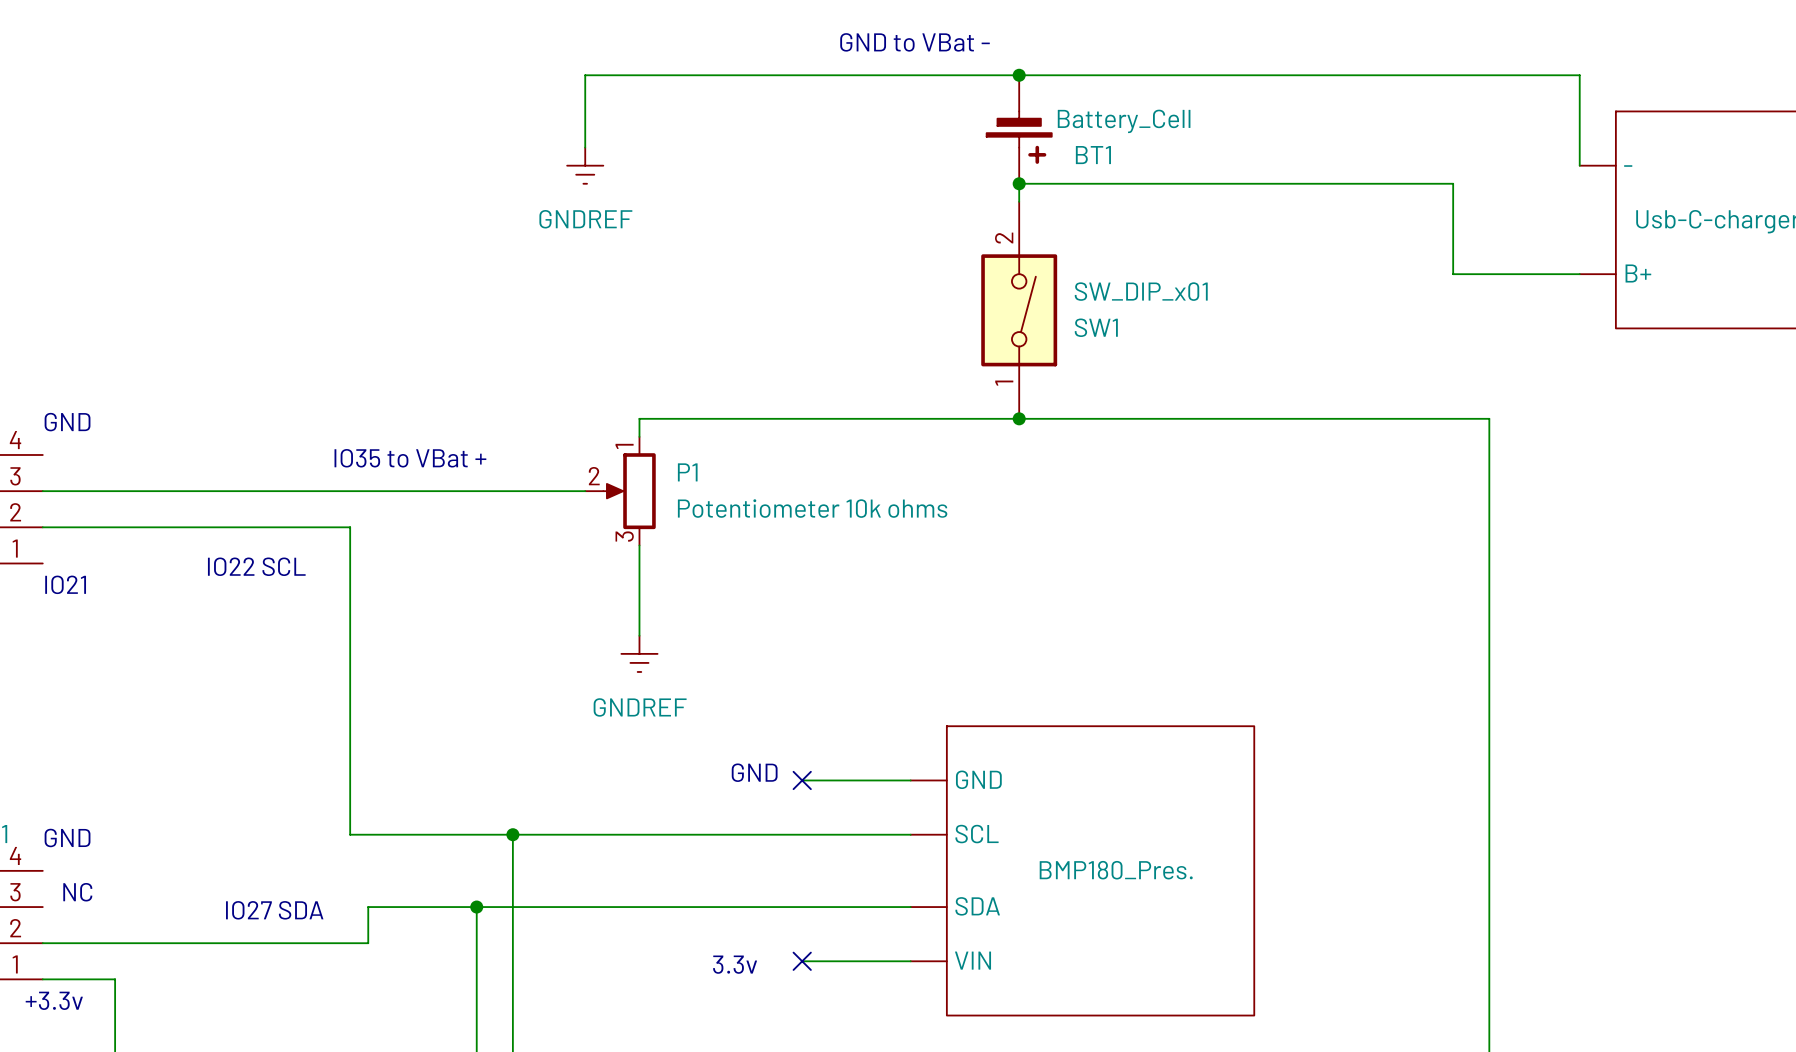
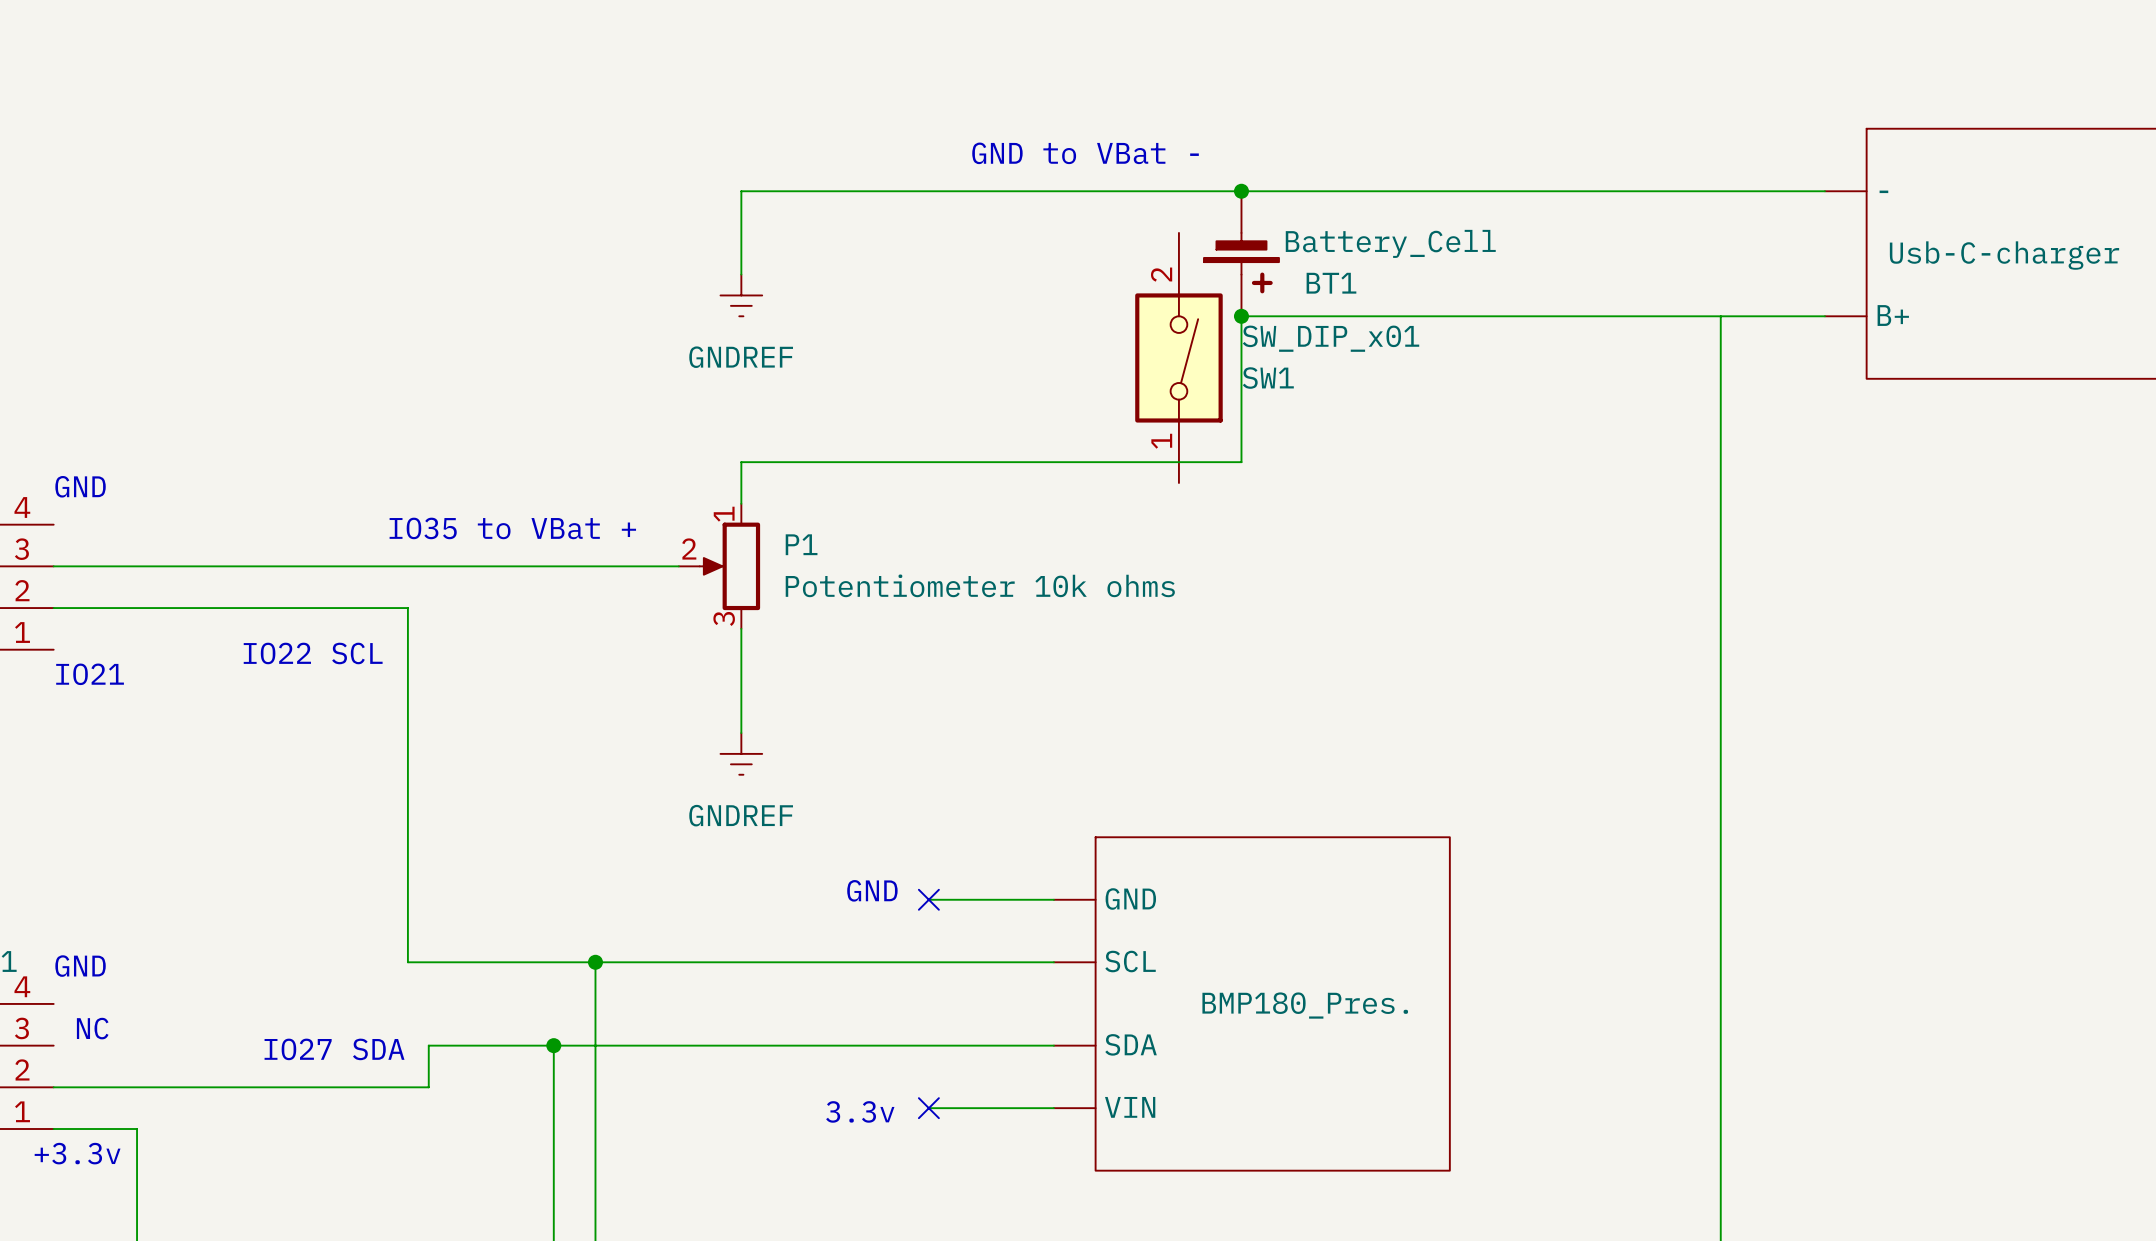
text position: GND to VBat - (915, 42) -> GND to VBat - (1085, 153)
junction: (1019, 75) -> none
BT1 position: (1019, 129) -> (1241, 253)
wire: (585, 147) (585, 75) (1579, 75) (1579, 165) -> (741, 274) (741, 191) (1824, 191)
power symbol position: GNDREF (585, 165) -> GNDREF (741, 295)
junction: none -> (1241, 191)
junction: (1019, 183) -> none
wire: (1019, 201) (1019, 183) (1453, 183) (1453, 274) -> none
junction: none -> (1241, 316)
wire: none -> (1720, 316) (1720, 483)
wire: (639, 418) (1489, 418) -> (741, 483) (741, 462) (1241, 462) (1241, 316) (1679, 316)
junction: (1019, 418) -> none

